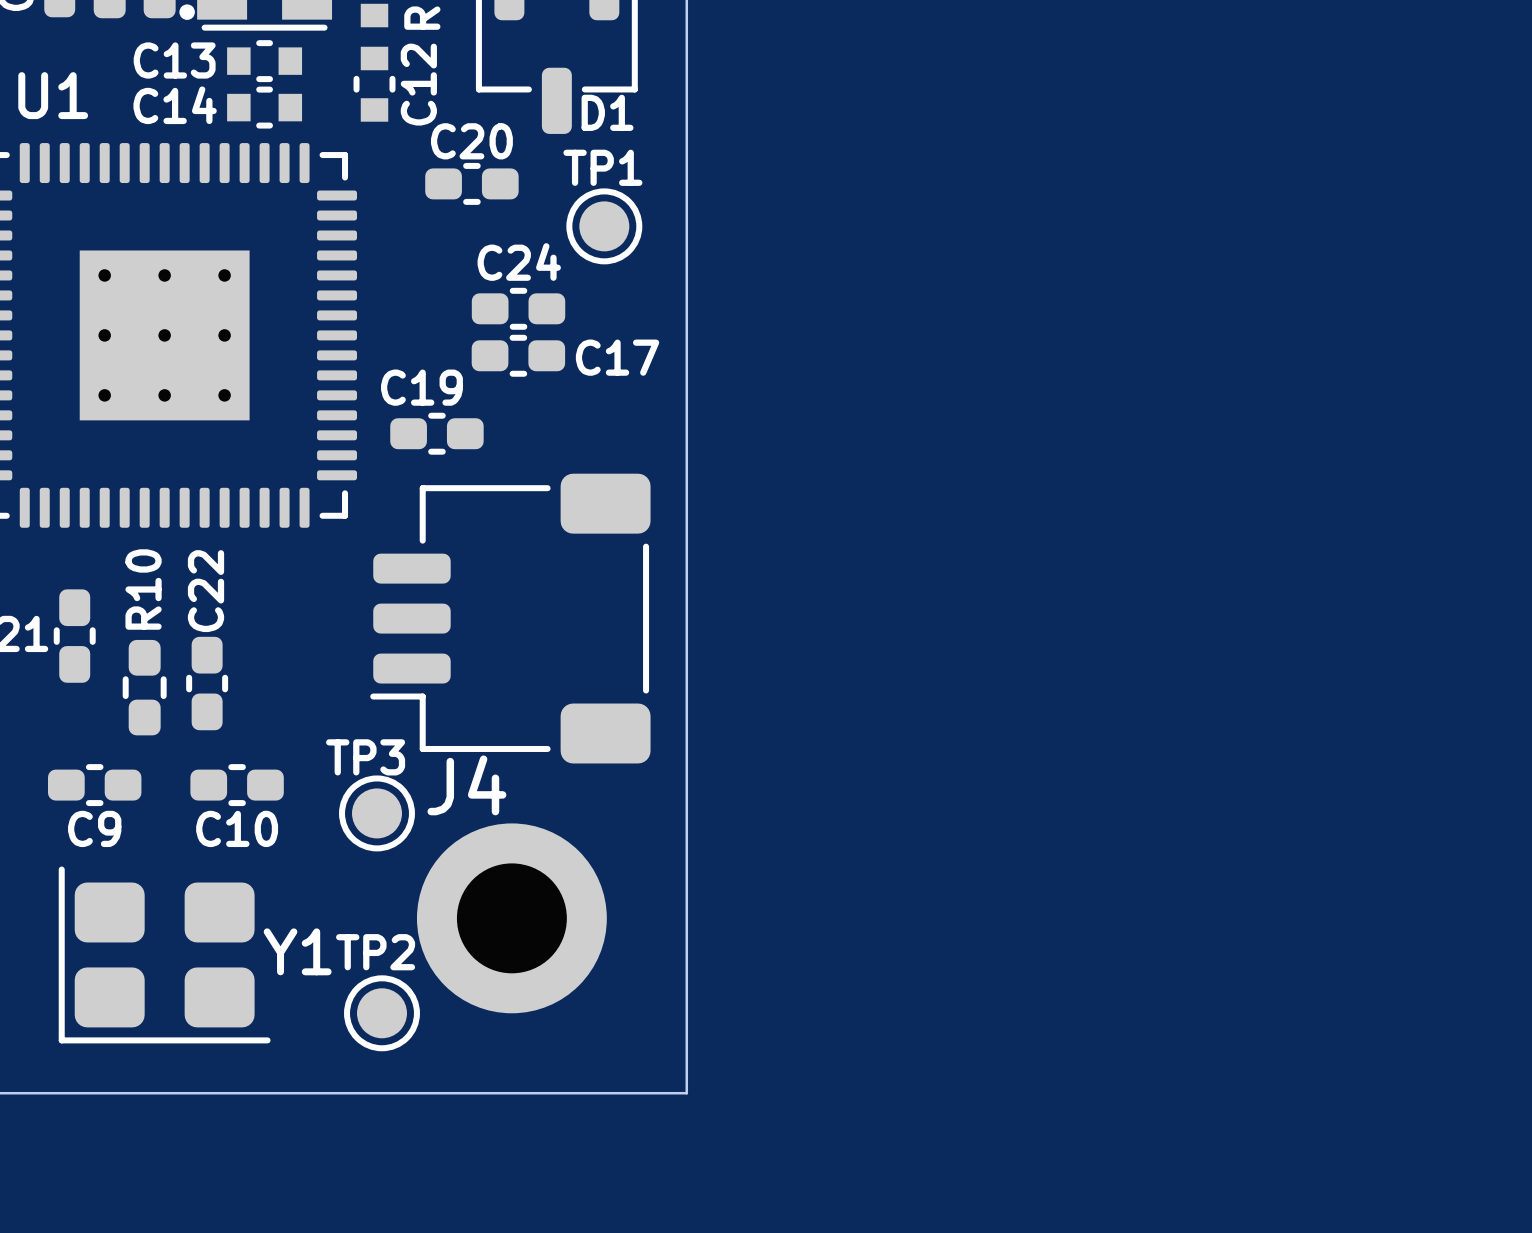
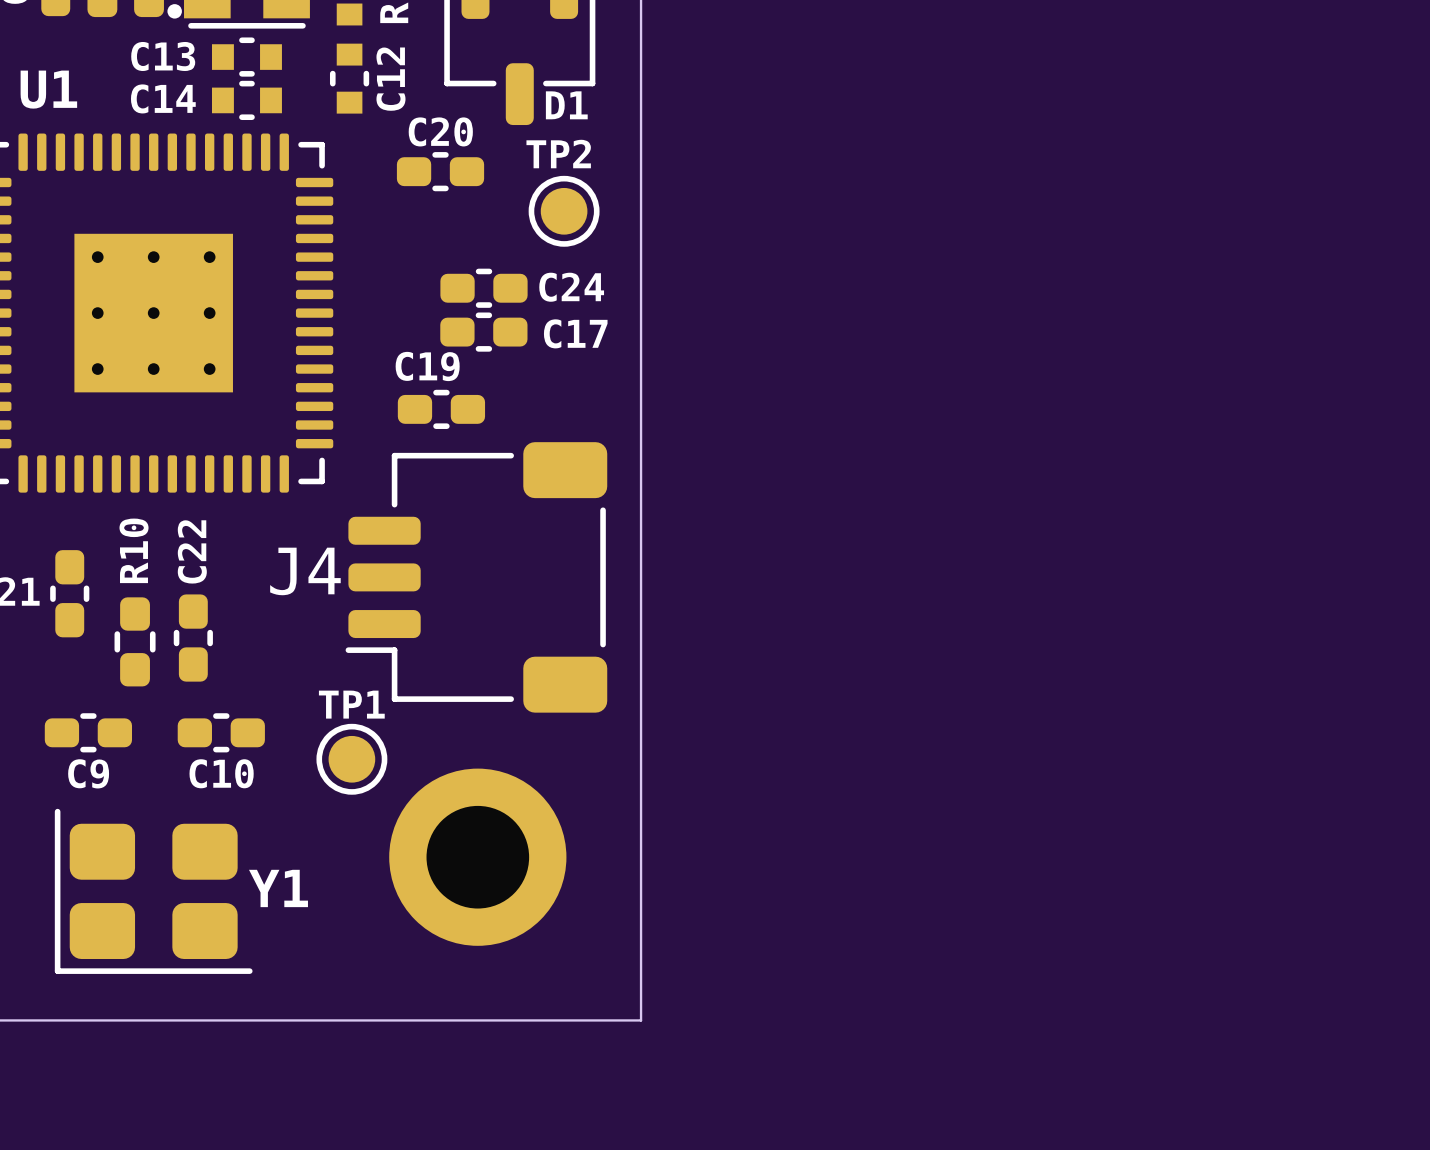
TP1 name: TP1 (602, 167) -> TP2 (558, 154)
C24 name position: C24 (519, 262) -> C24 (571, 287)
C19 position: (436, 433) -> (441, 409)
TP3 name: TP3 (365, 757) -> TP1 (351, 704)
J4 name position: J4 (466, 785) -> J4 (305, 571)
TP2: (381, 1013) -> none

